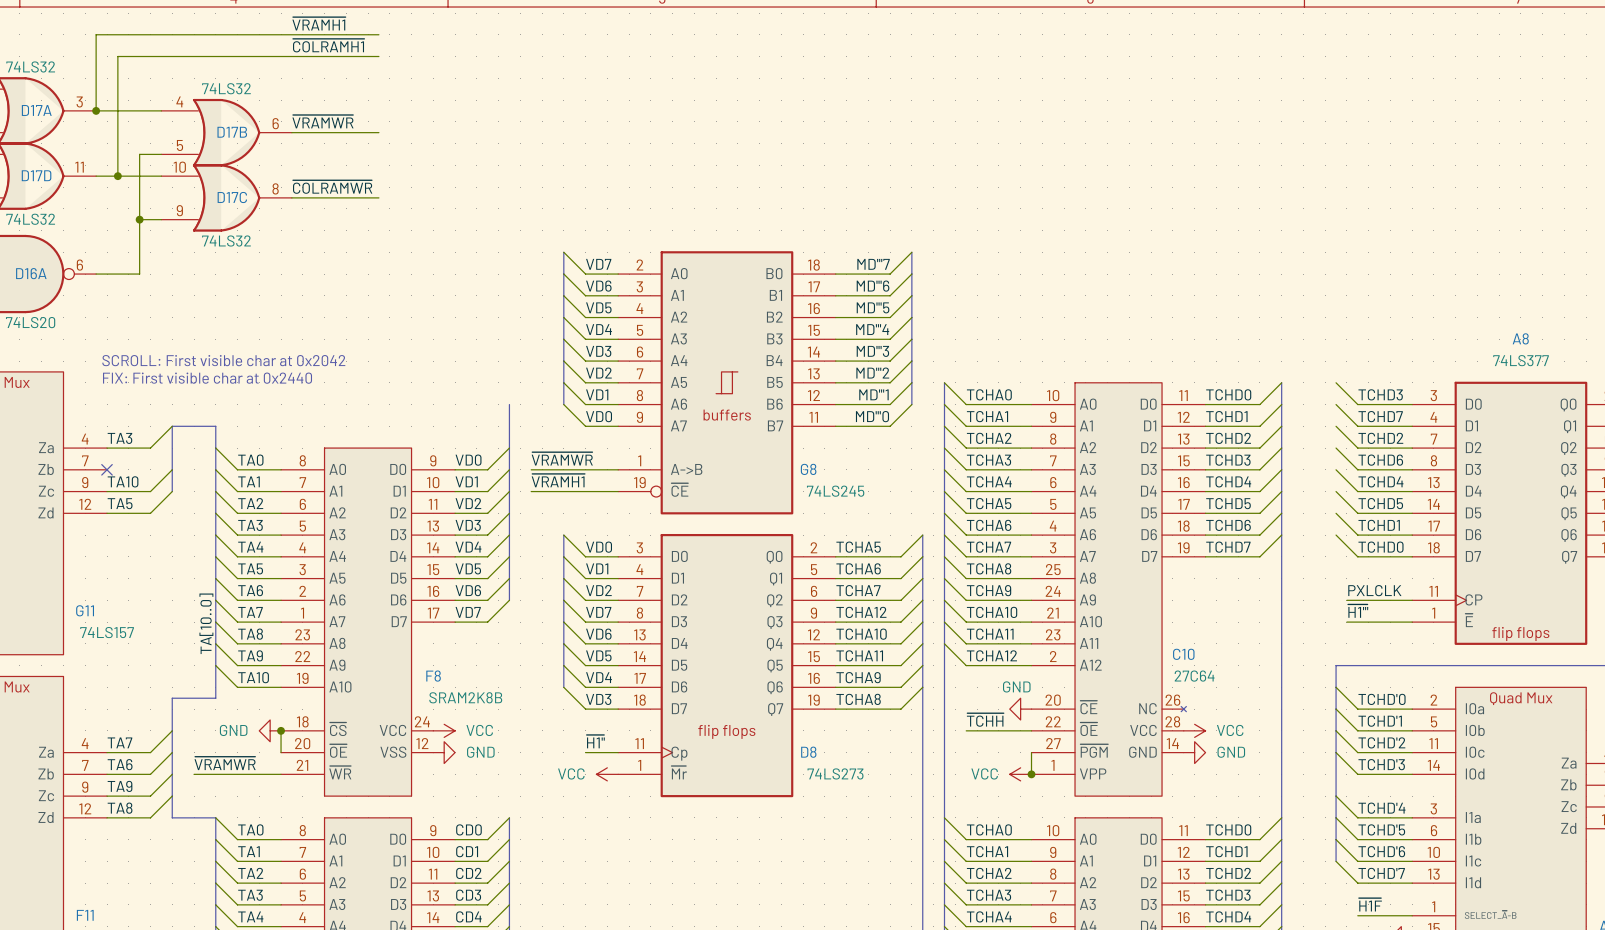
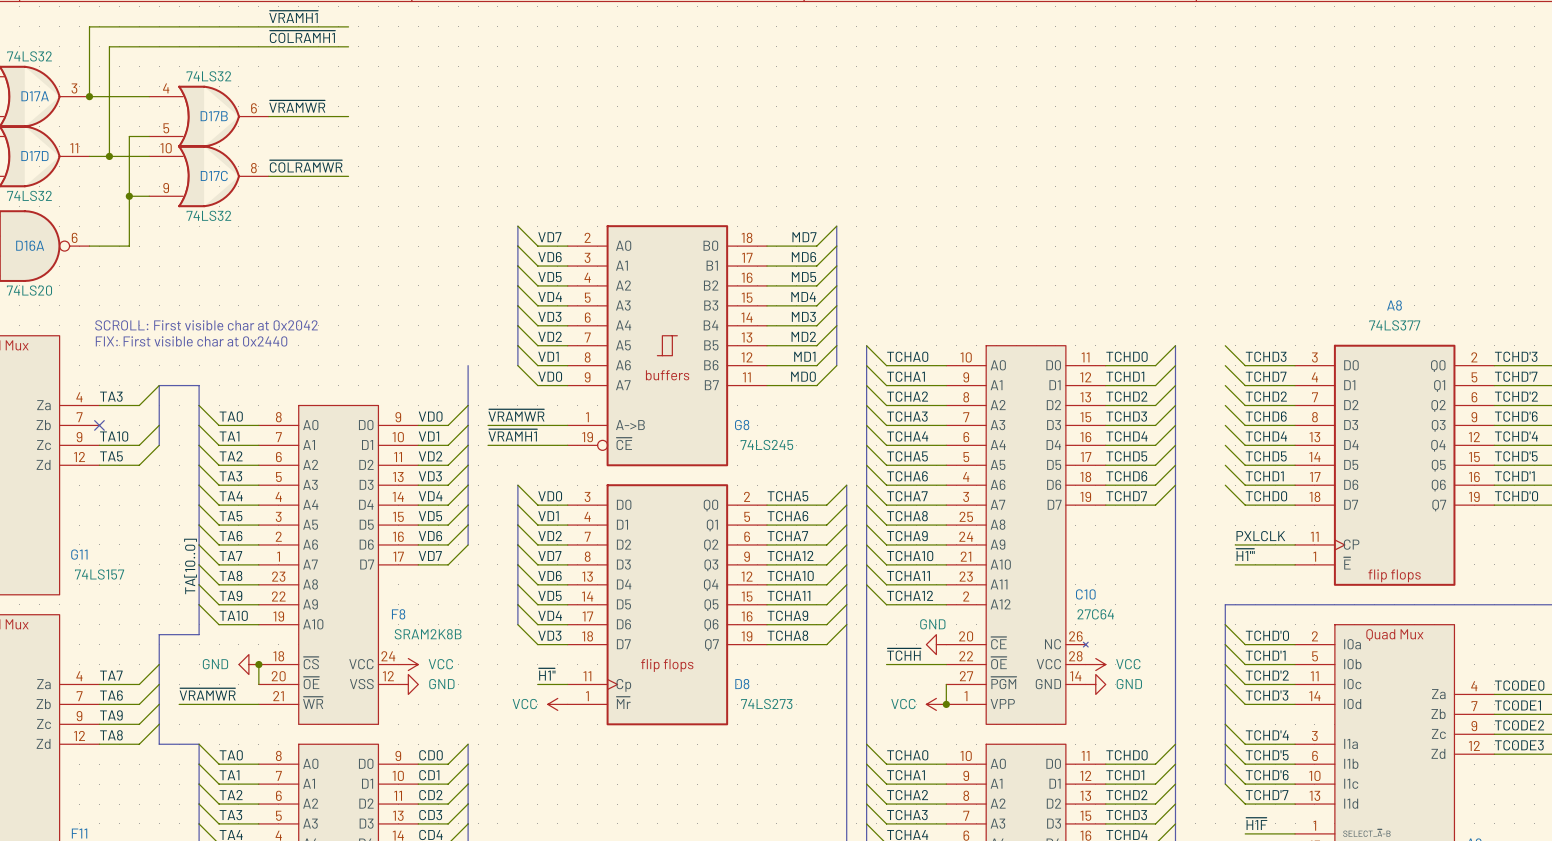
label: MD'''7 (873, 264) -> MD7 (804, 237)
label: MD'''6 (873, 286) -> MD6 (803, 257)
label: MD'''5 (873, 307) -> MD5 (803, 277)
label: MD'''4 (872, 329) -> MD4 (803, 296)
label: MD'''3 (872, 351) -> MD3 (803, 316)
label: MD'''2 (872, 373) -> MD2 (803, 336)
label: MD'''1 (873, 394) -> MD1 (804, 356)
label: MD'''0 (872, 416) -> MD0 (803, 376)

